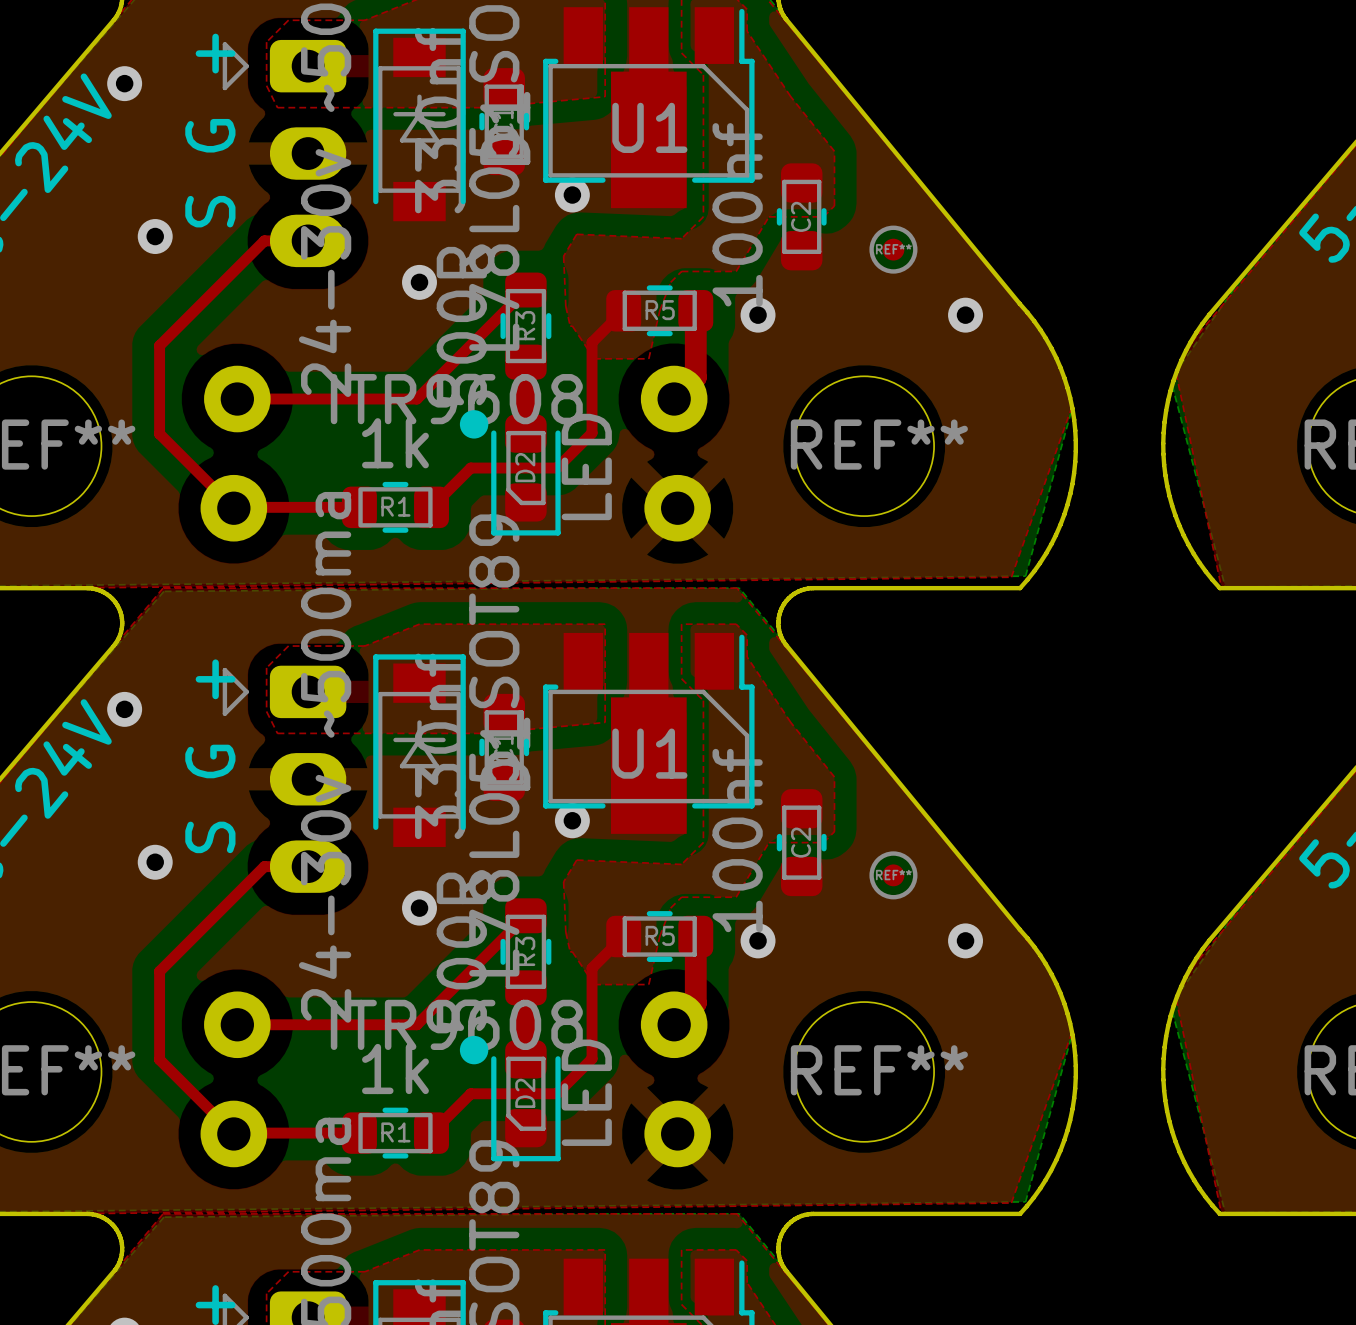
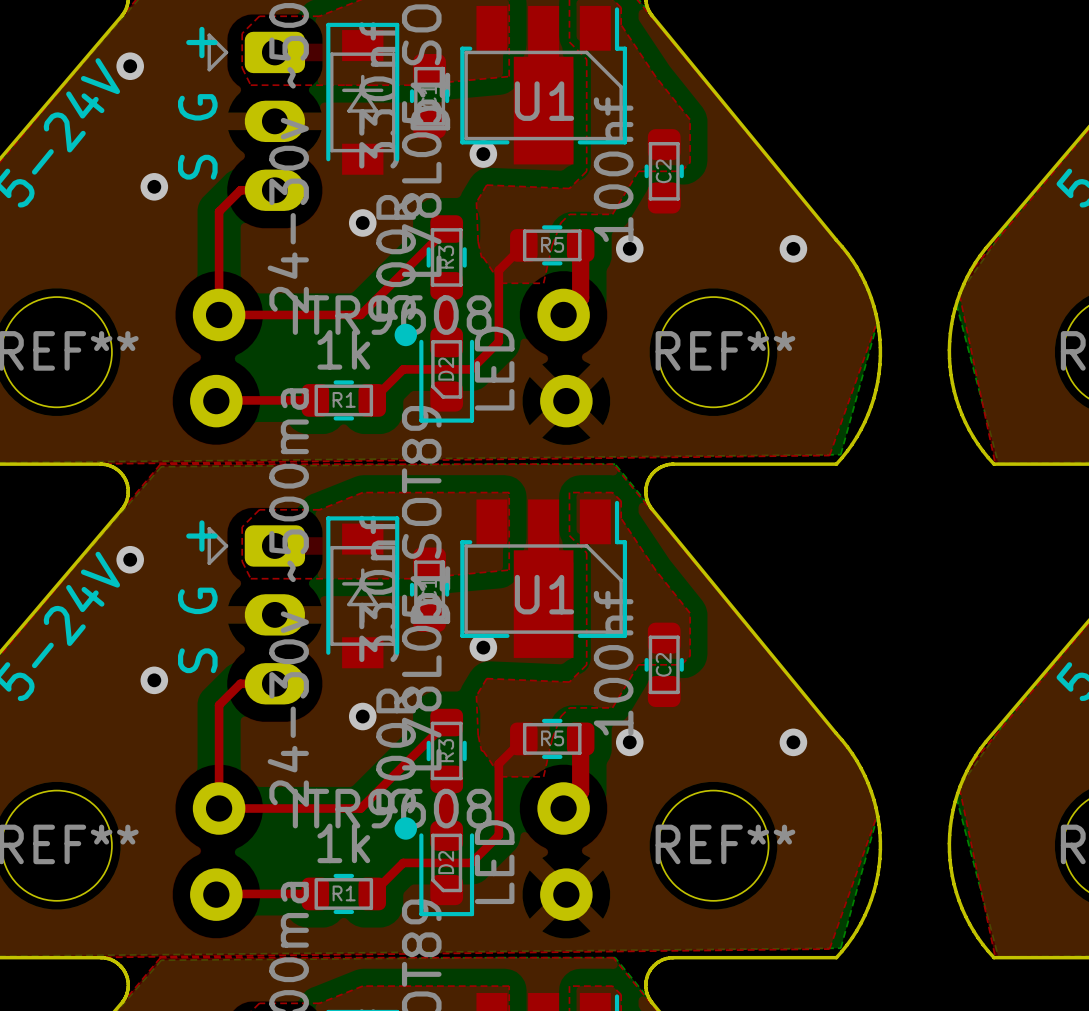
REF**: (893, 249) -> none
top track: (237, 267) (159, 345) (159, 433) (233, 508) -> (219, 211) (219, 314)
REF**: (893, 875) -> none
top track: (237, 893) (159, 971) (159, 1059) (233, 1133) -> (219, 705) (219, 808)

